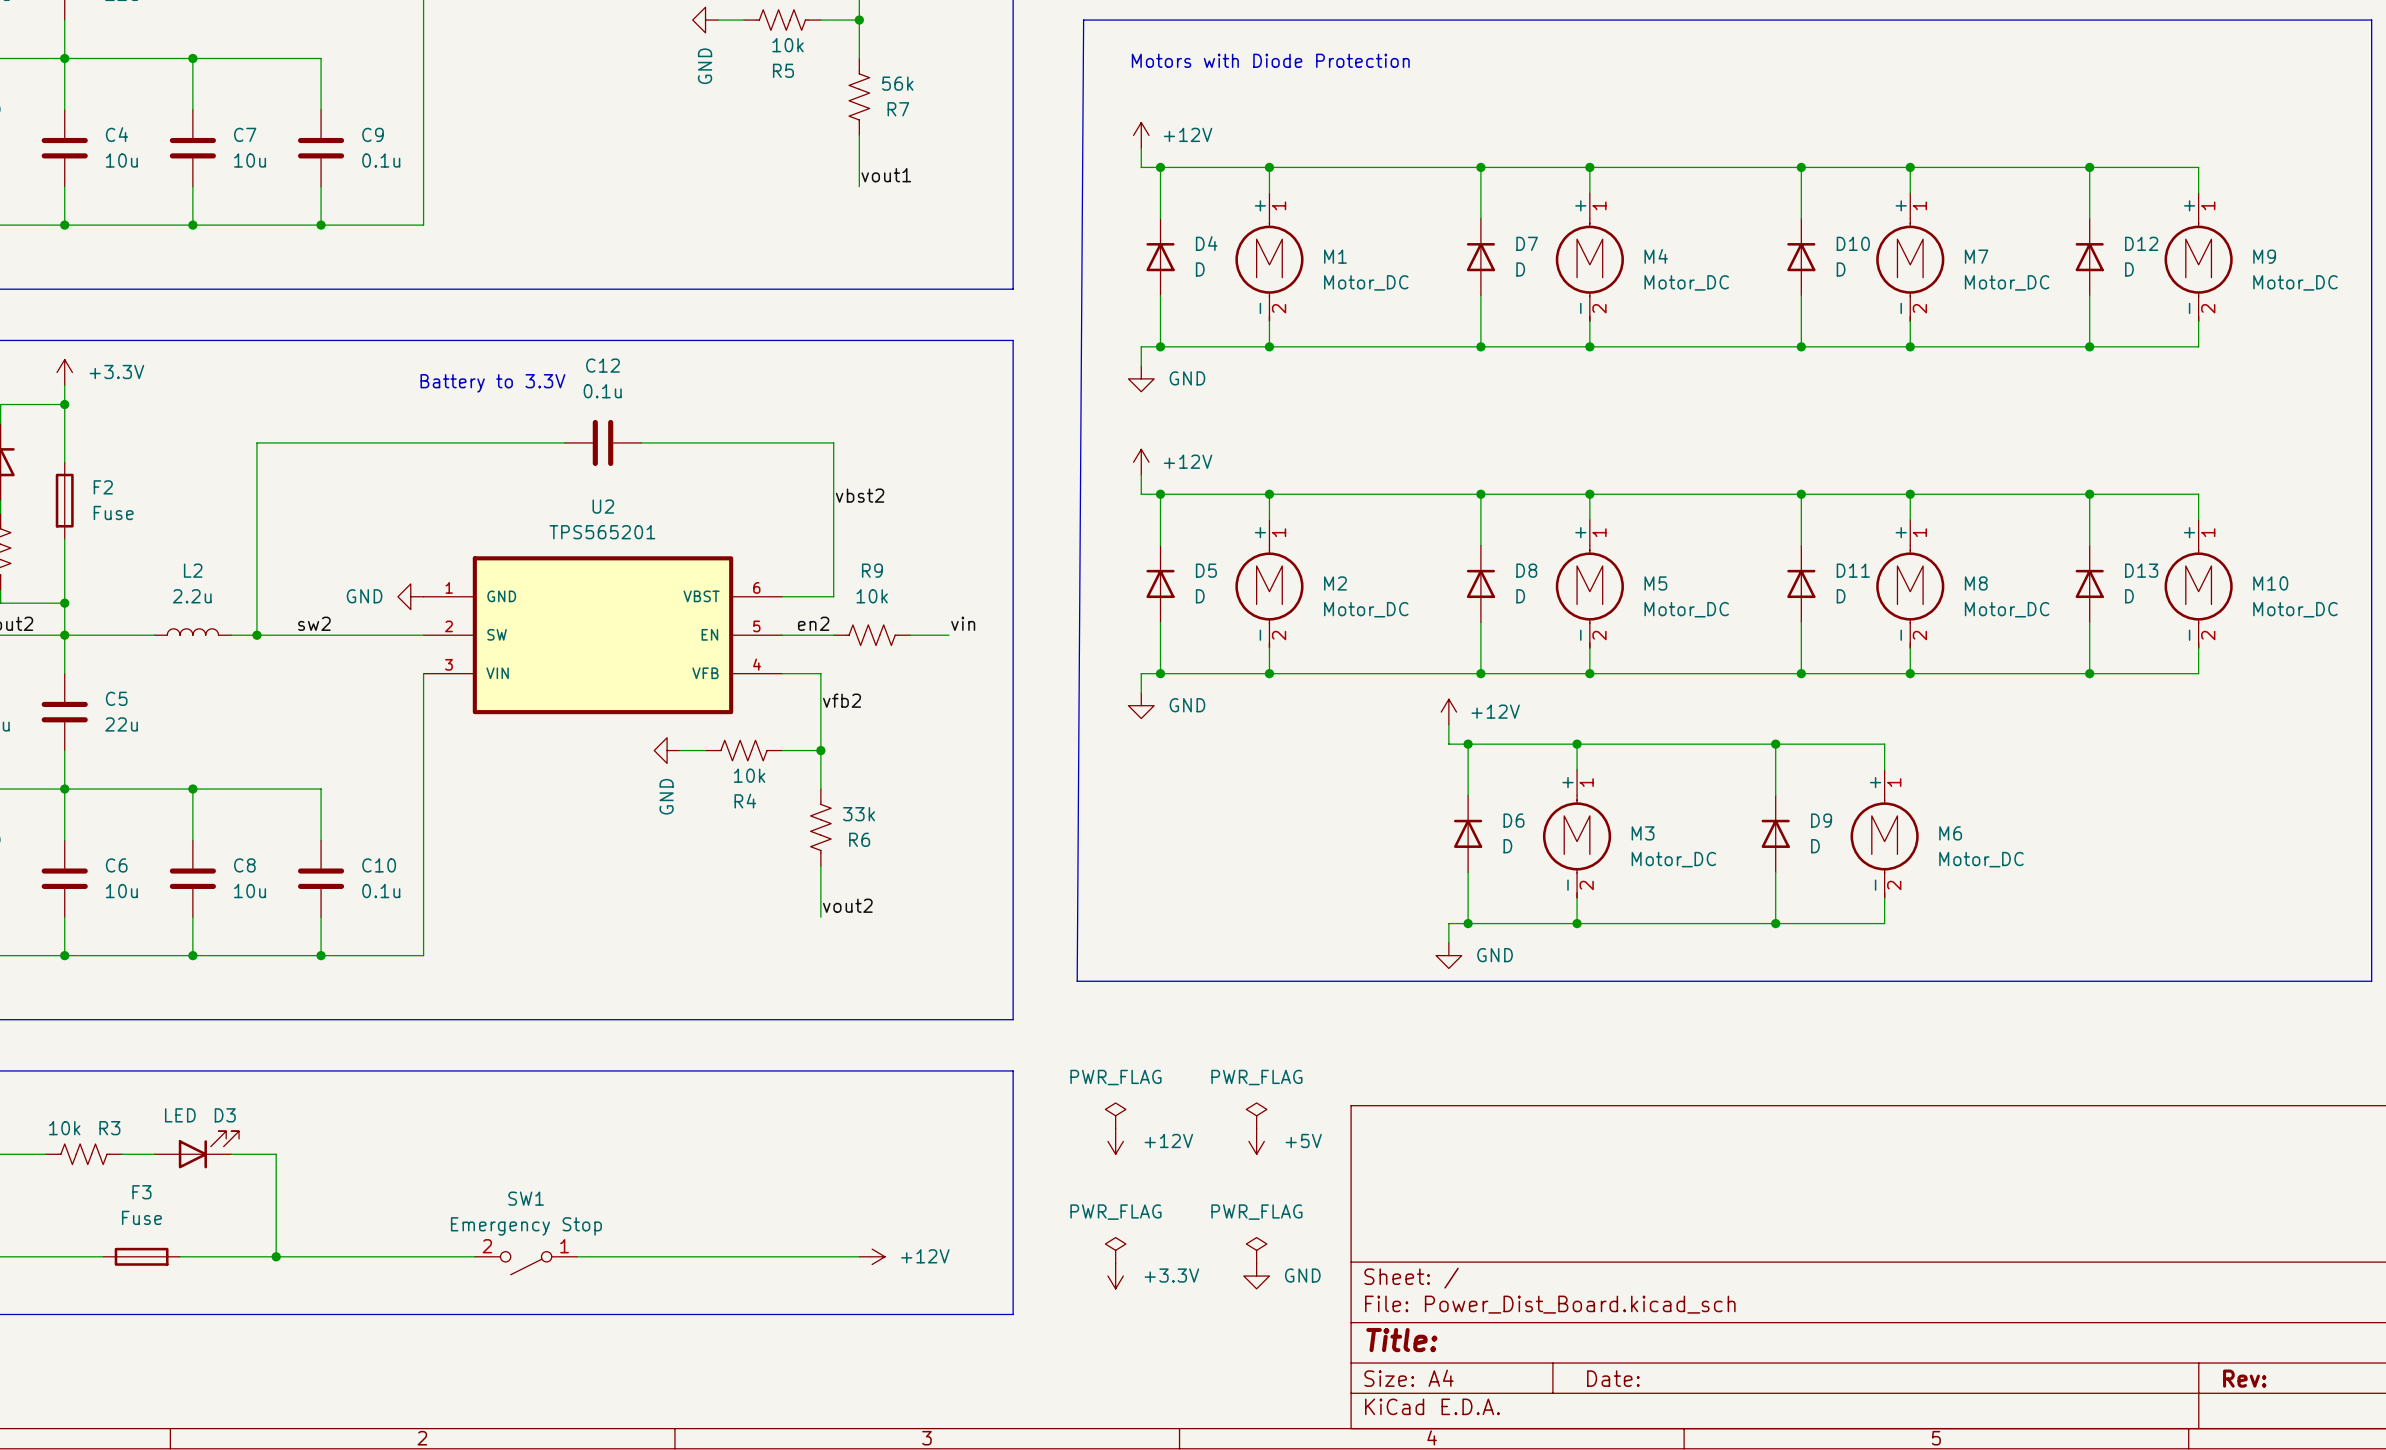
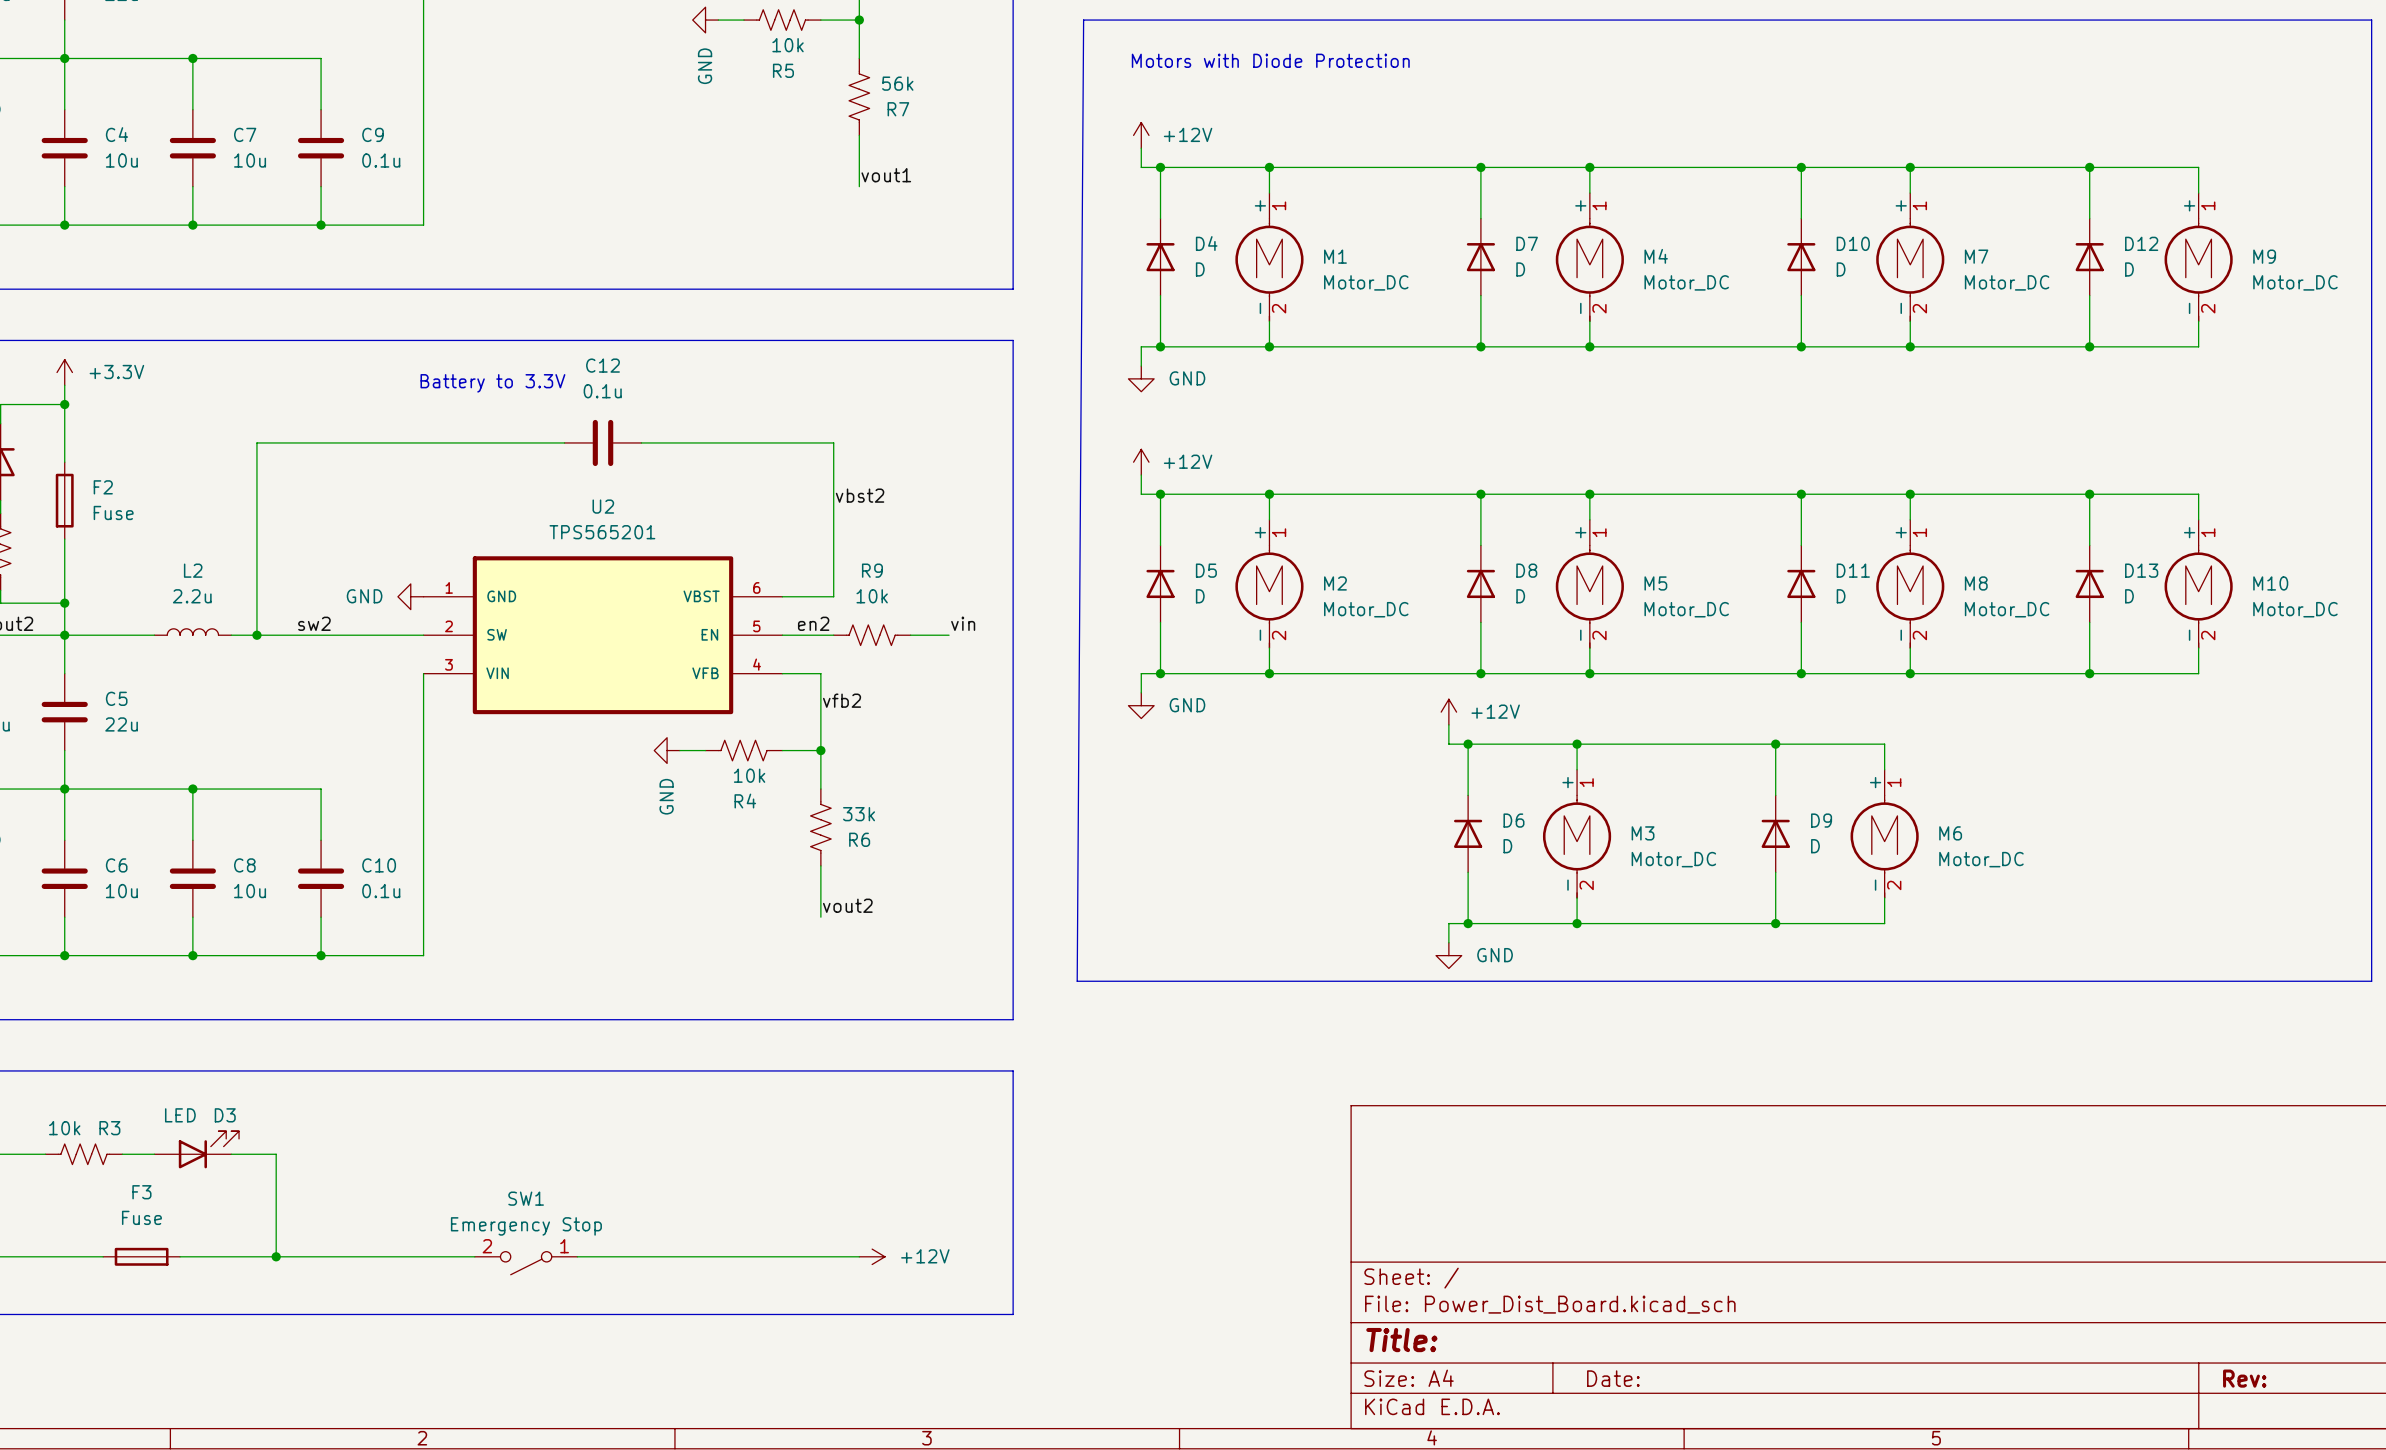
power symbol: PWR_FLAG (1115, 1115) -> none
power symbol: PWR_FLAG (1256, 1115) -> none
power symbol: +12V (1115, 1141) -> none
power symbol: +5V (1256, 1141) -> none
power symbol: PWR_FLAG (1115, 1250) -> none
power symbol: PWR_FLAG (1256, 1250) -> none
power symbol: +3.3V (1115, 1276) -> none
power symbol: GND (1256, 1276) -> none

